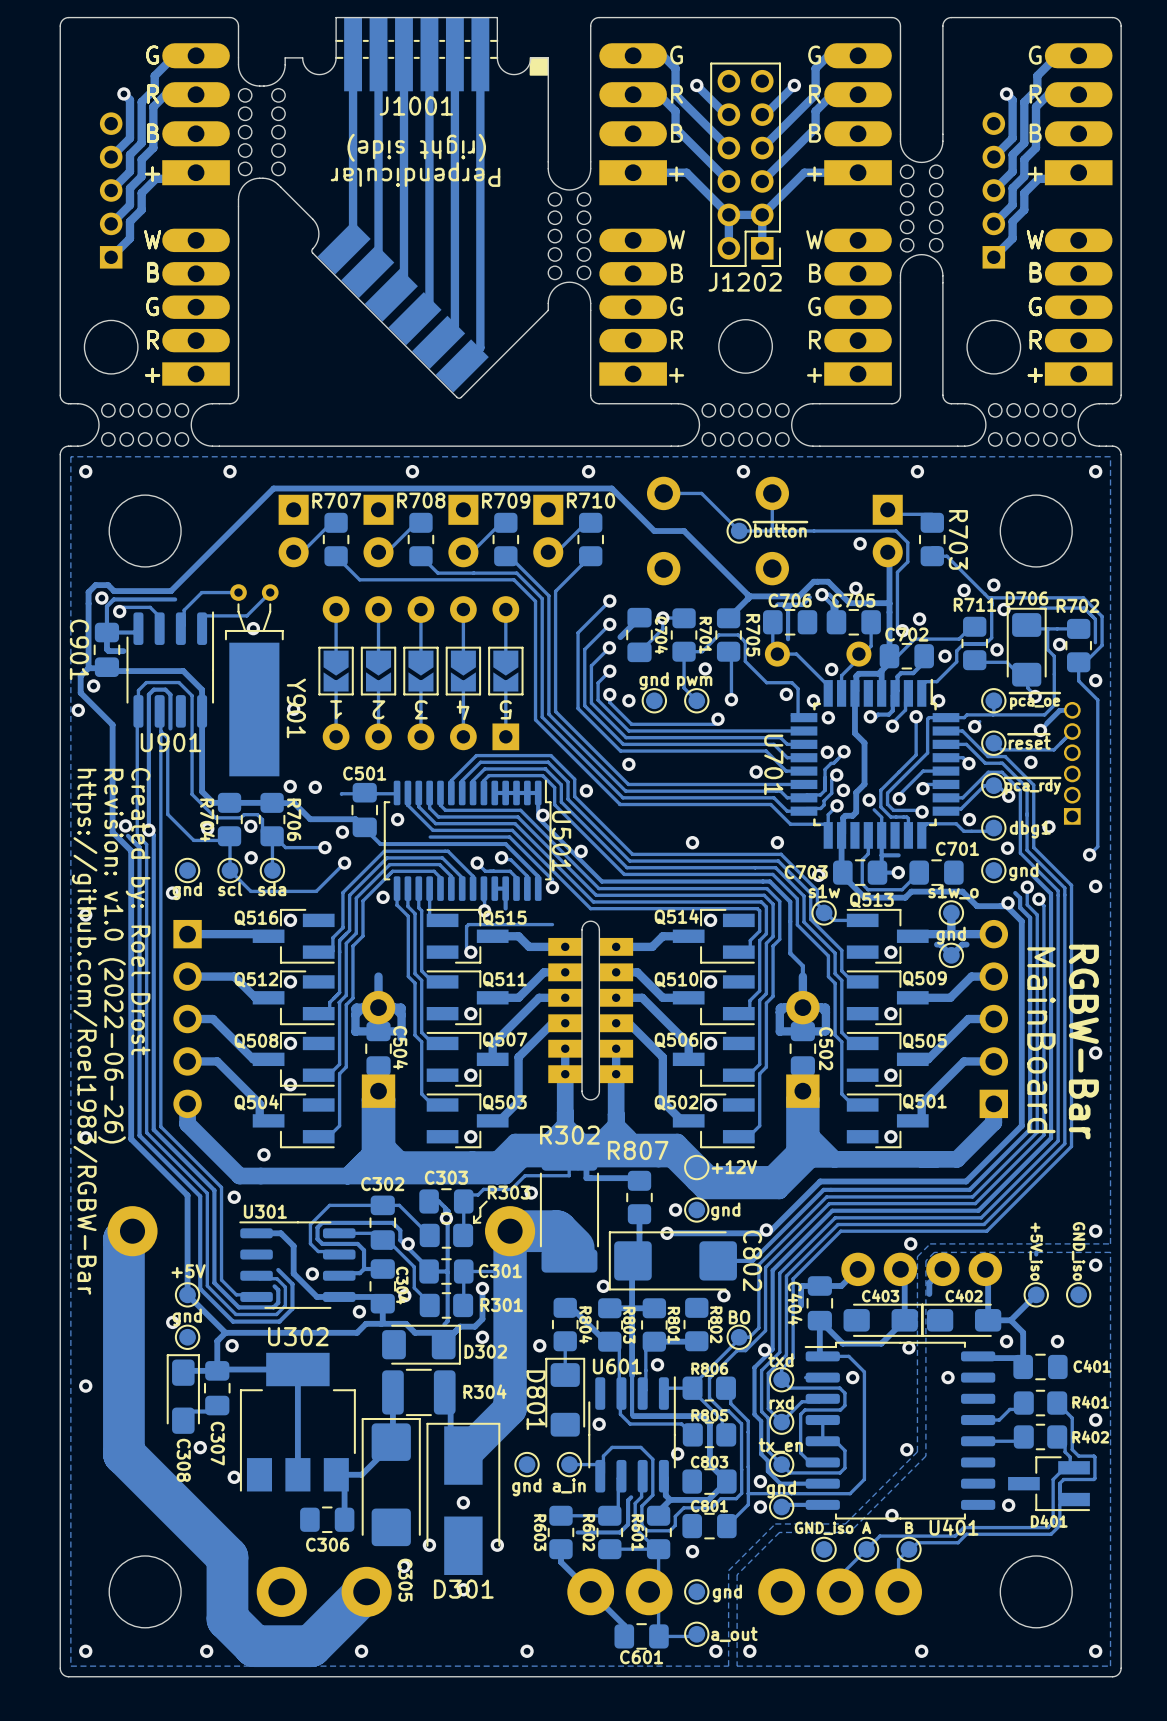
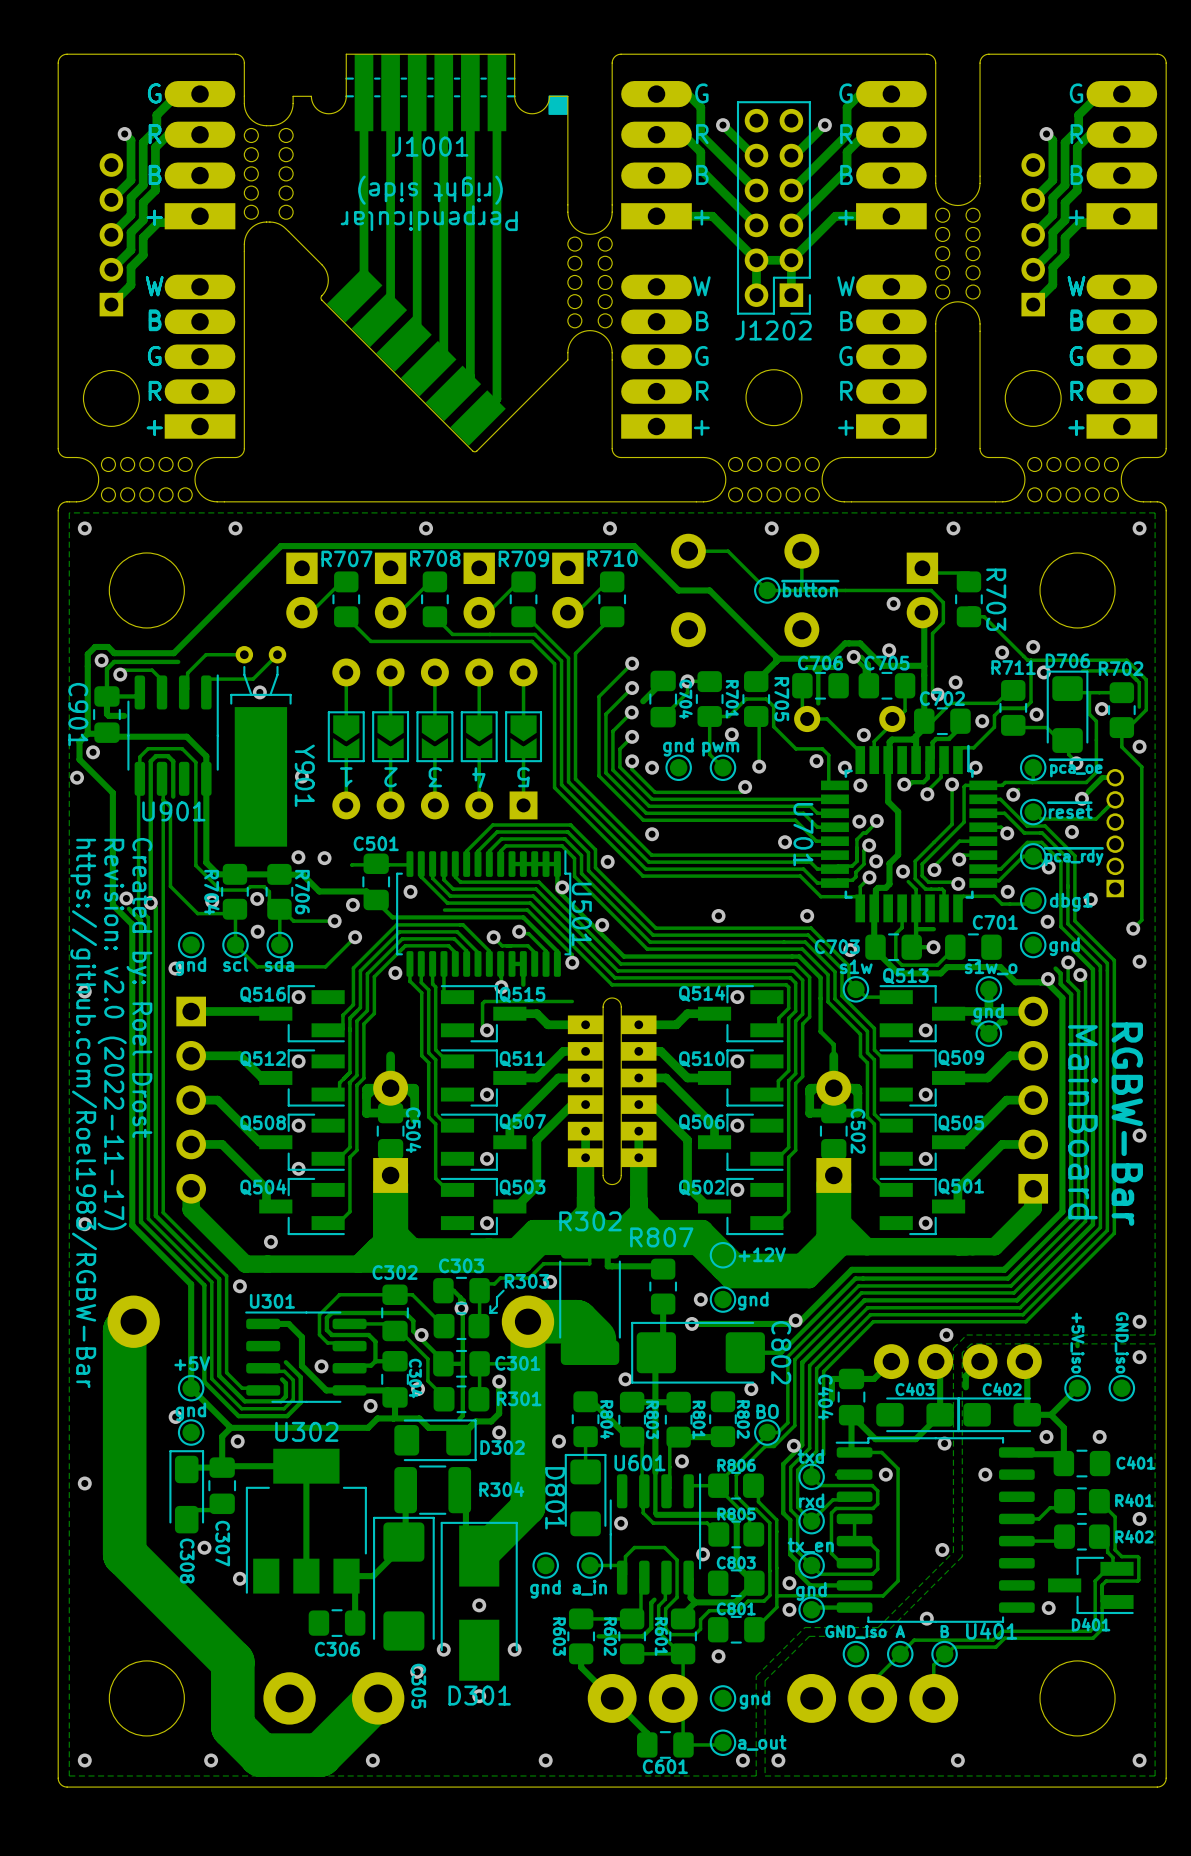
text: Revision: v1.0 (2022-06-26) (111, 956) -> Revision: v2.0 (2022-11-17) (112, 1034)

